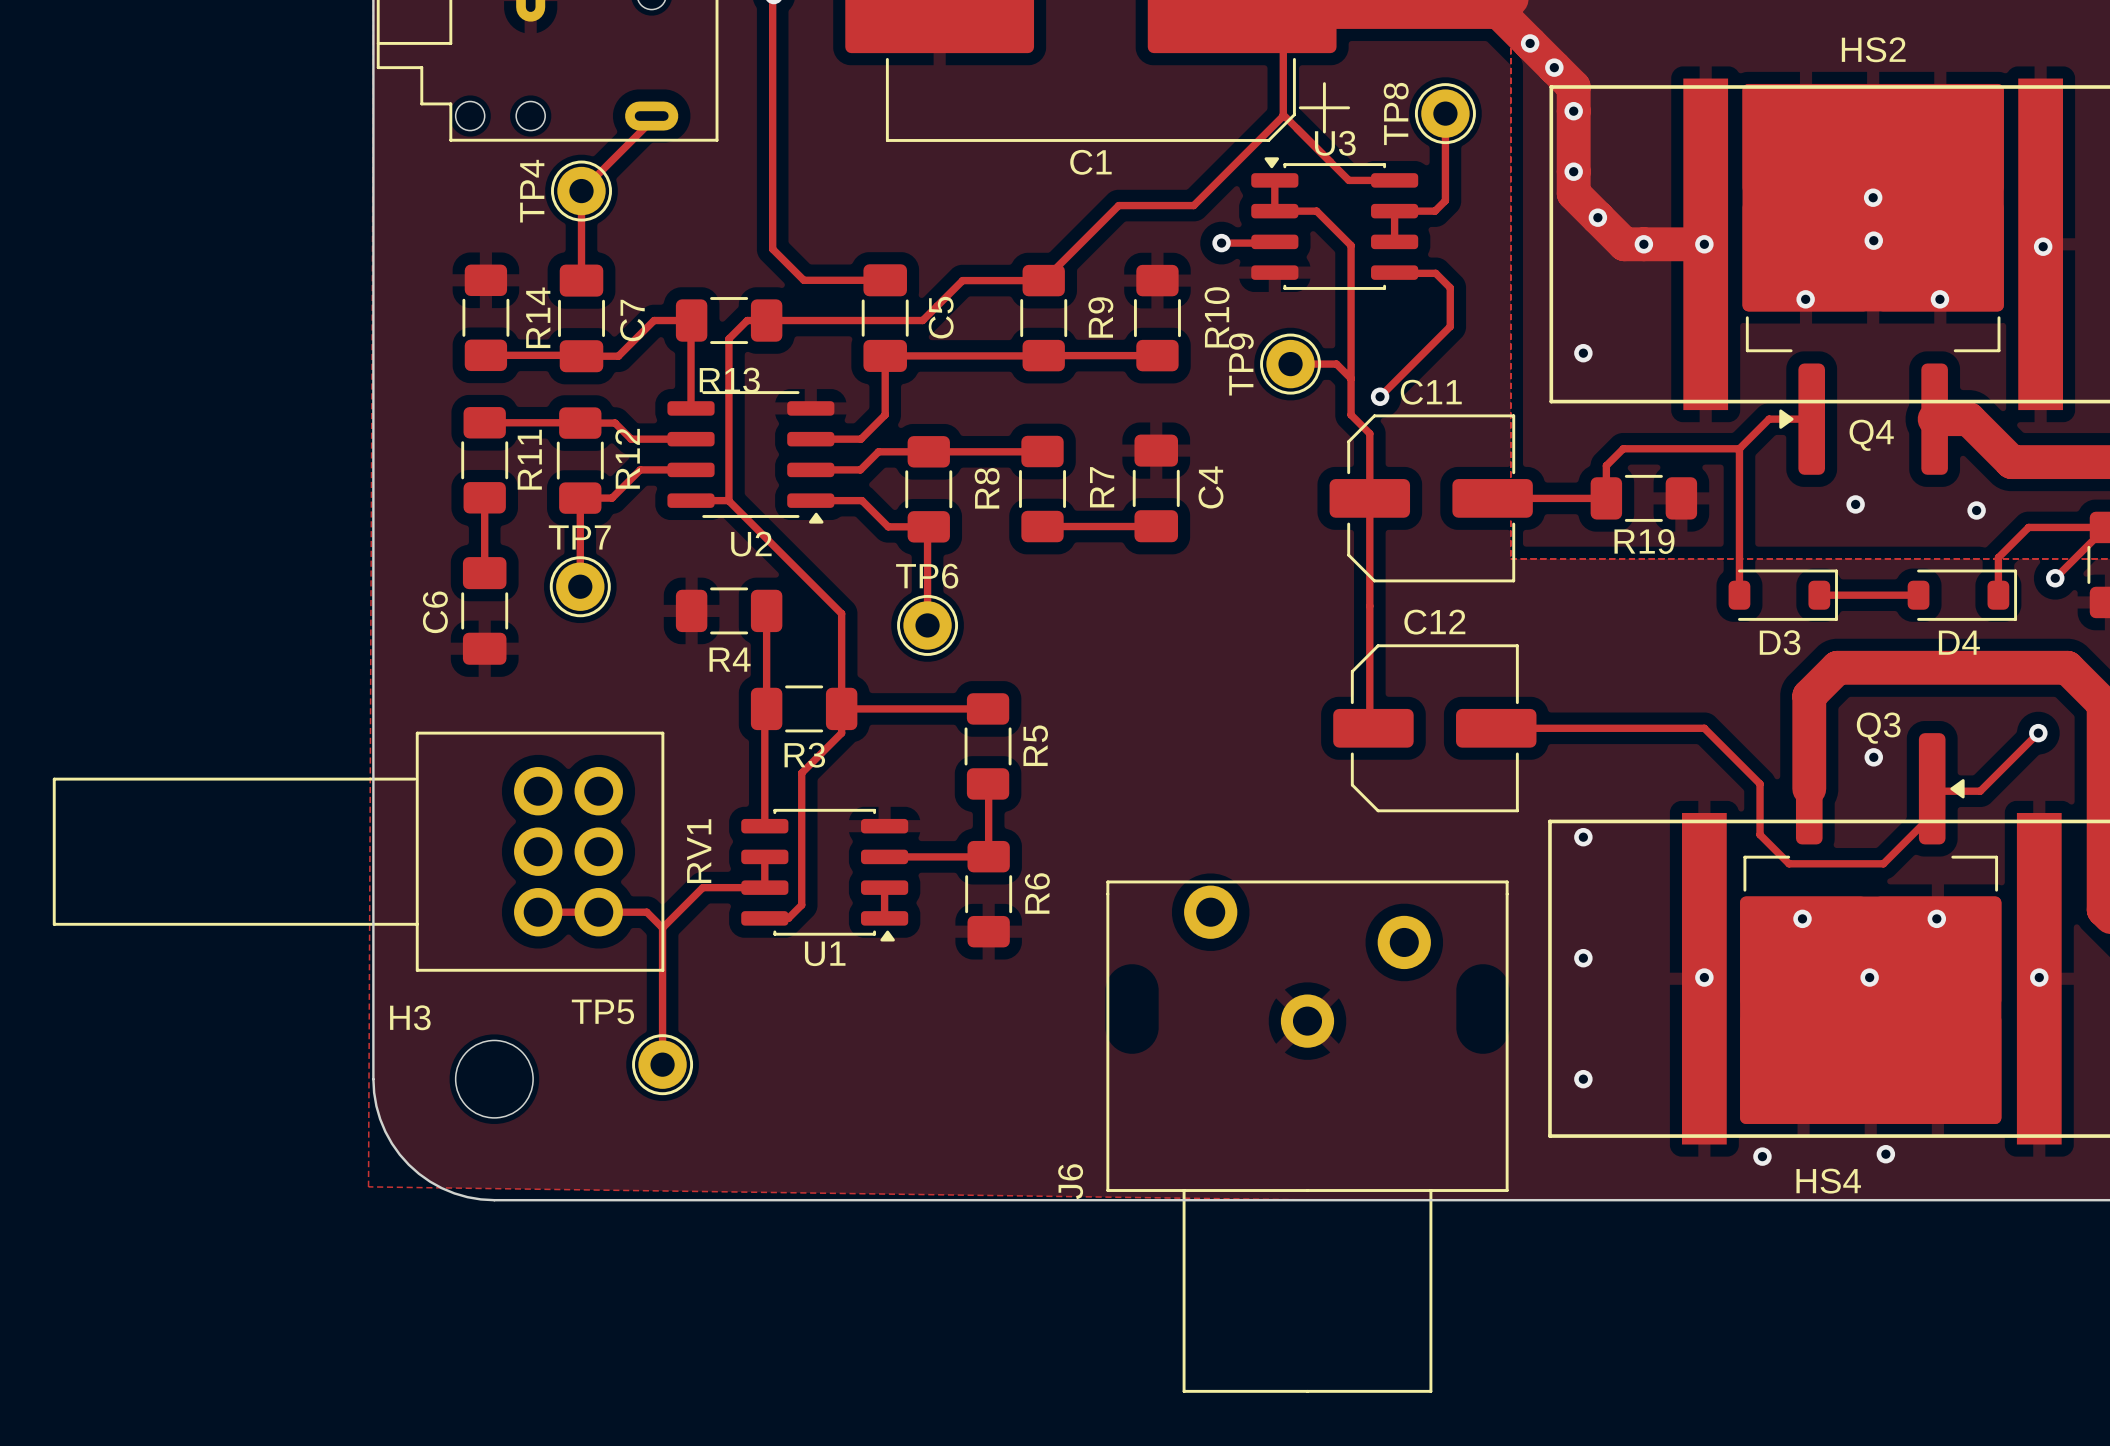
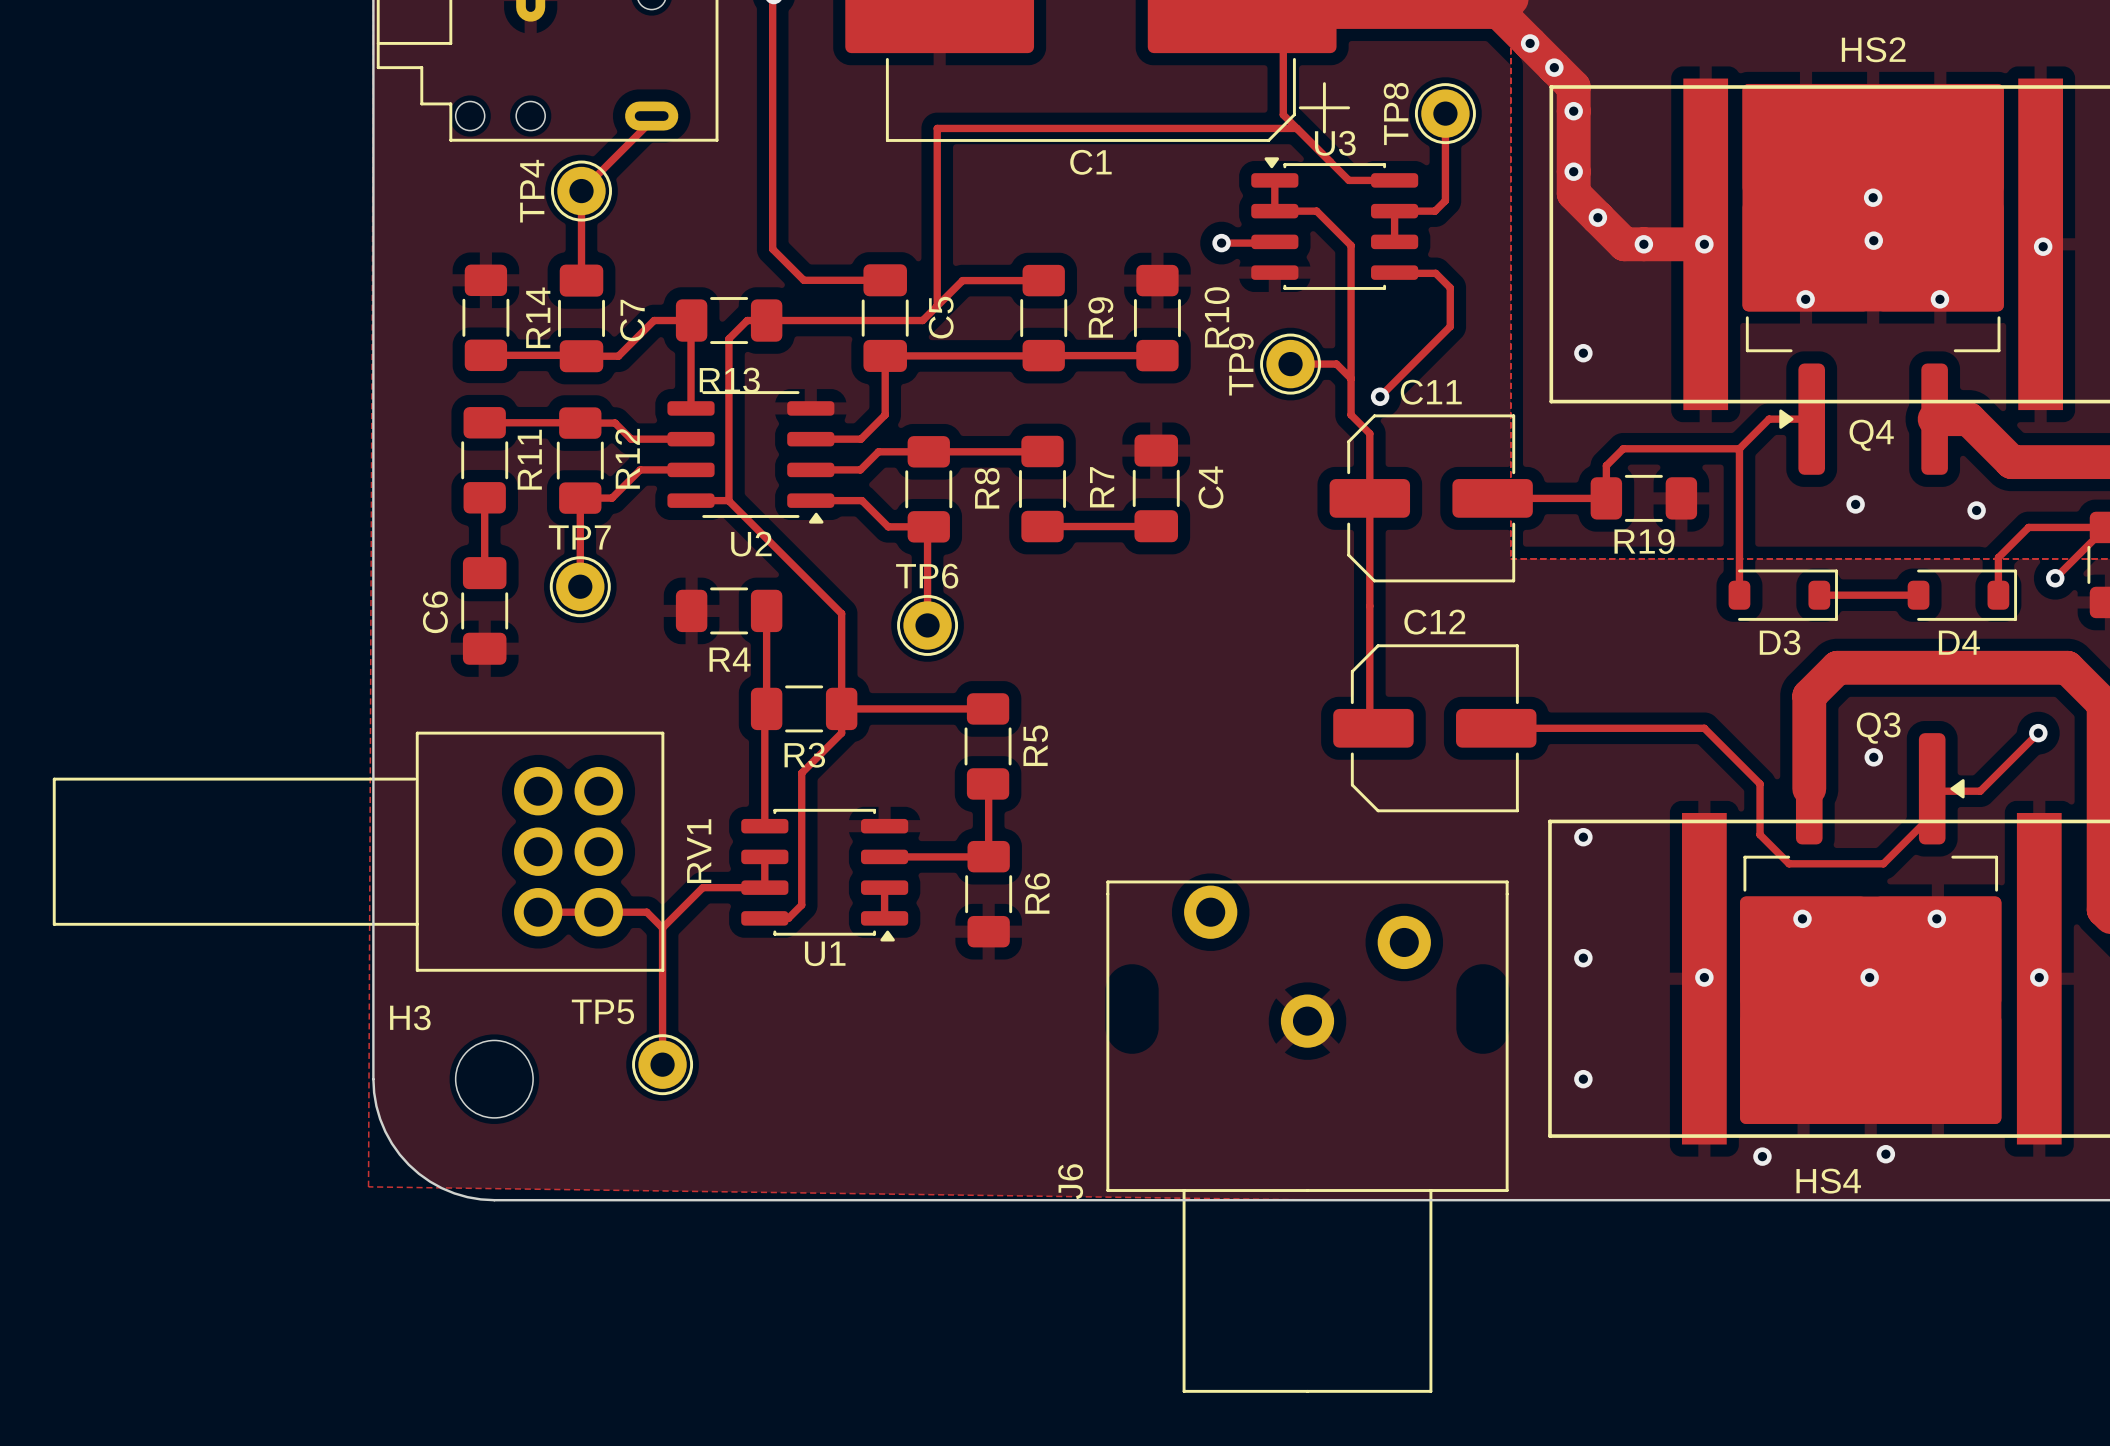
track: (1283, 114) (1193, 205) (1118, 205) (1043, 280) -> none
track: none -> (1296, 128) (937, 128) (937, 306)

